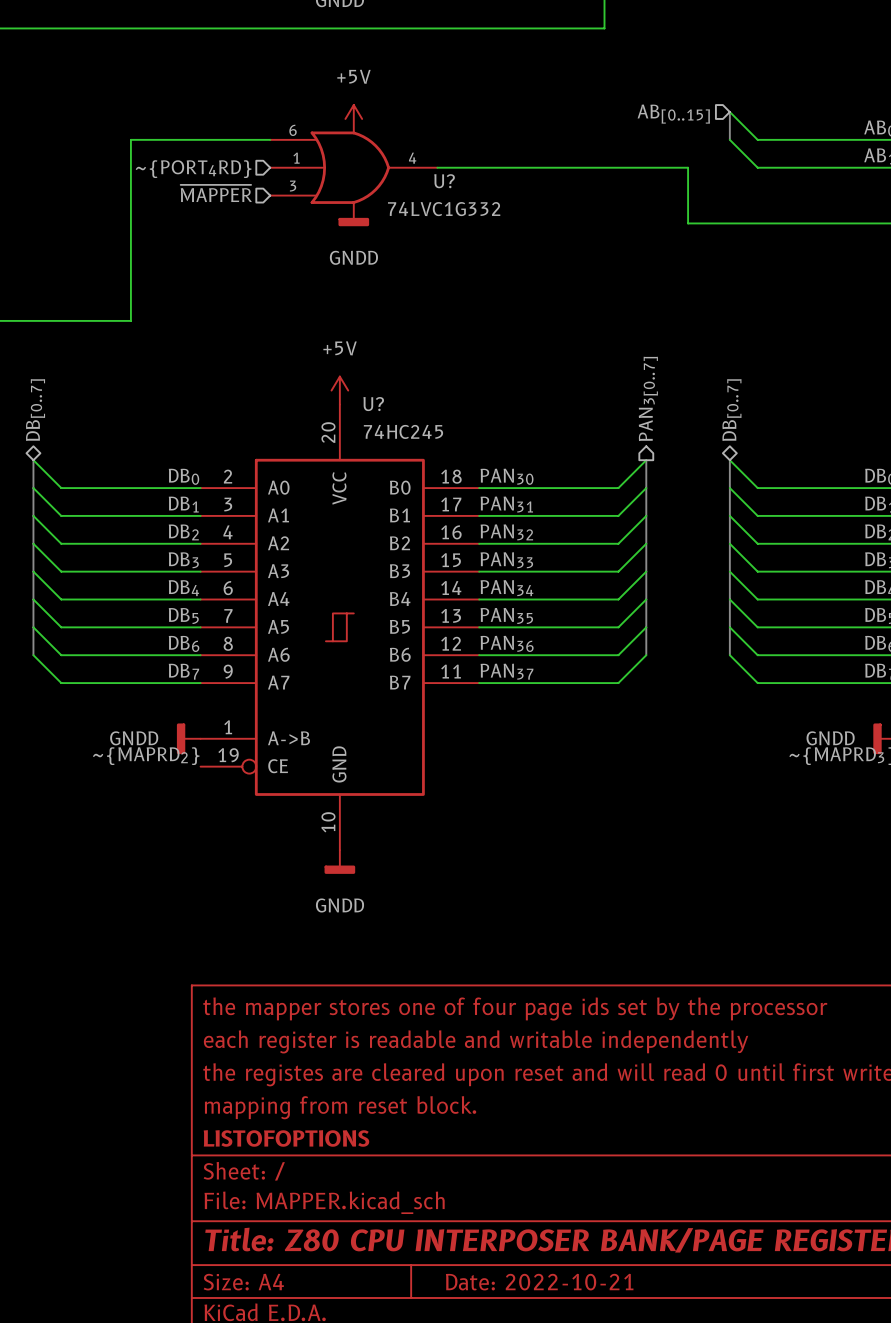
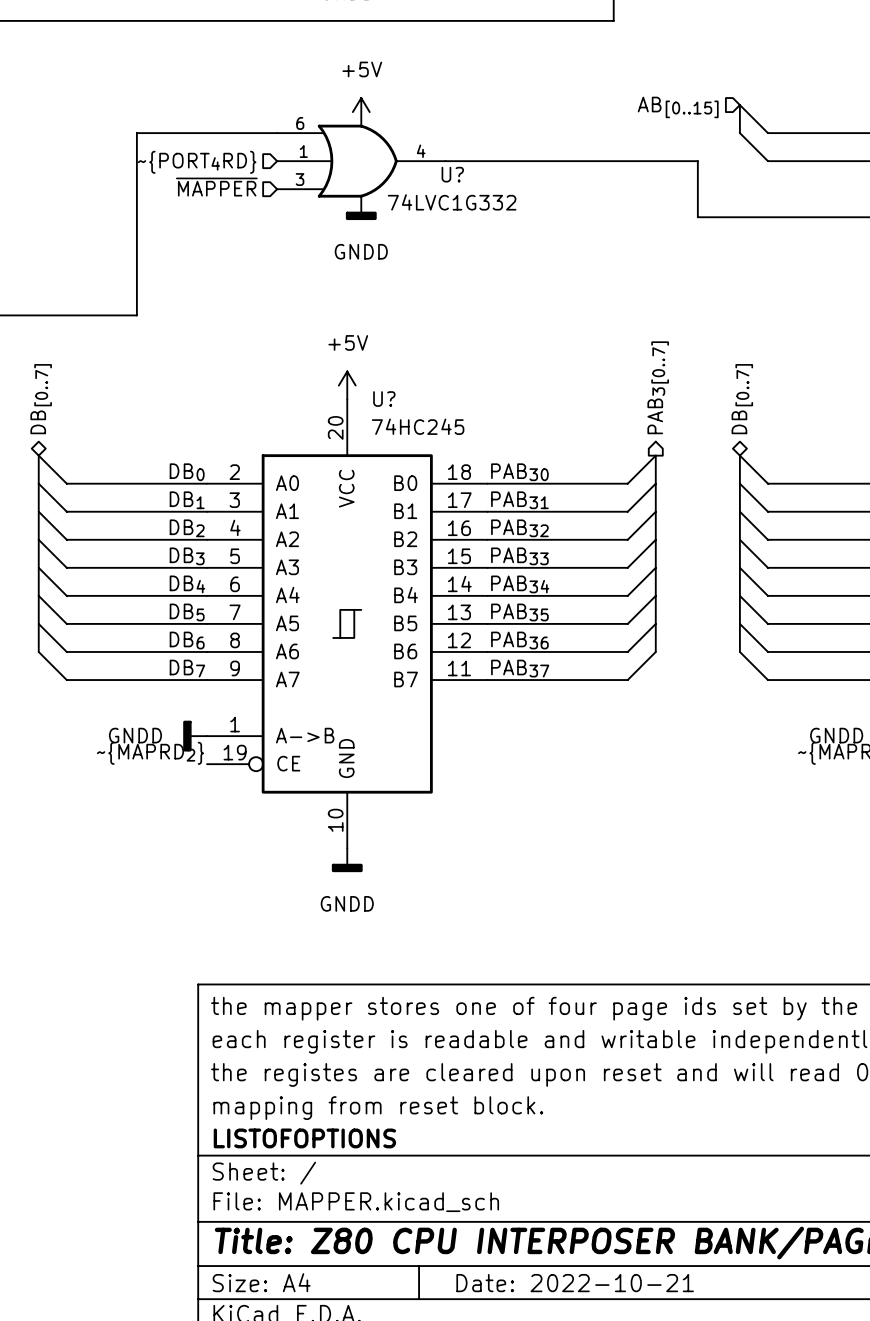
hierarchical label: PAN3[0..7] (648, 398) -> PAB3[0..7] (658, 387)
label: PAN30 (507, 476) -> PAB30 (519, 472)
label: PAN31 (506, 504) -> PAB31 (519, 500)
label: PAN32 (506, 532) -> PAB32 (519, 528)
label: PAN33 (506, 560) -> PAB33 (519, 556)
label: PAN34 (506, 588) -> PAB34 (520, 584)
label: PAN35 (506, 615) -> PAB35 (519, 612)
label: PAN36 (507, 643) -> PAB36 (519, 640)
label: PAN37 (506, 671) -> PAB37 (520, 668)

